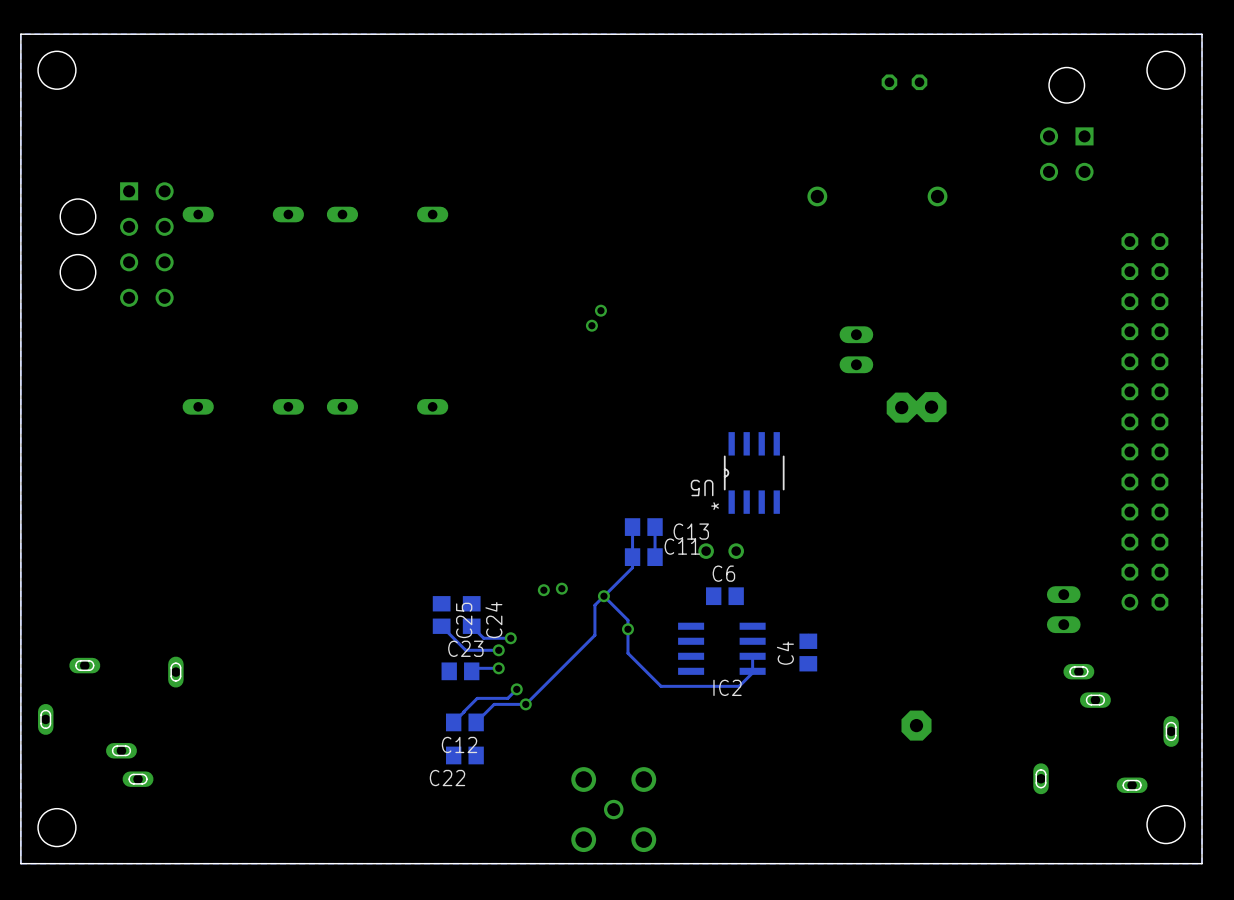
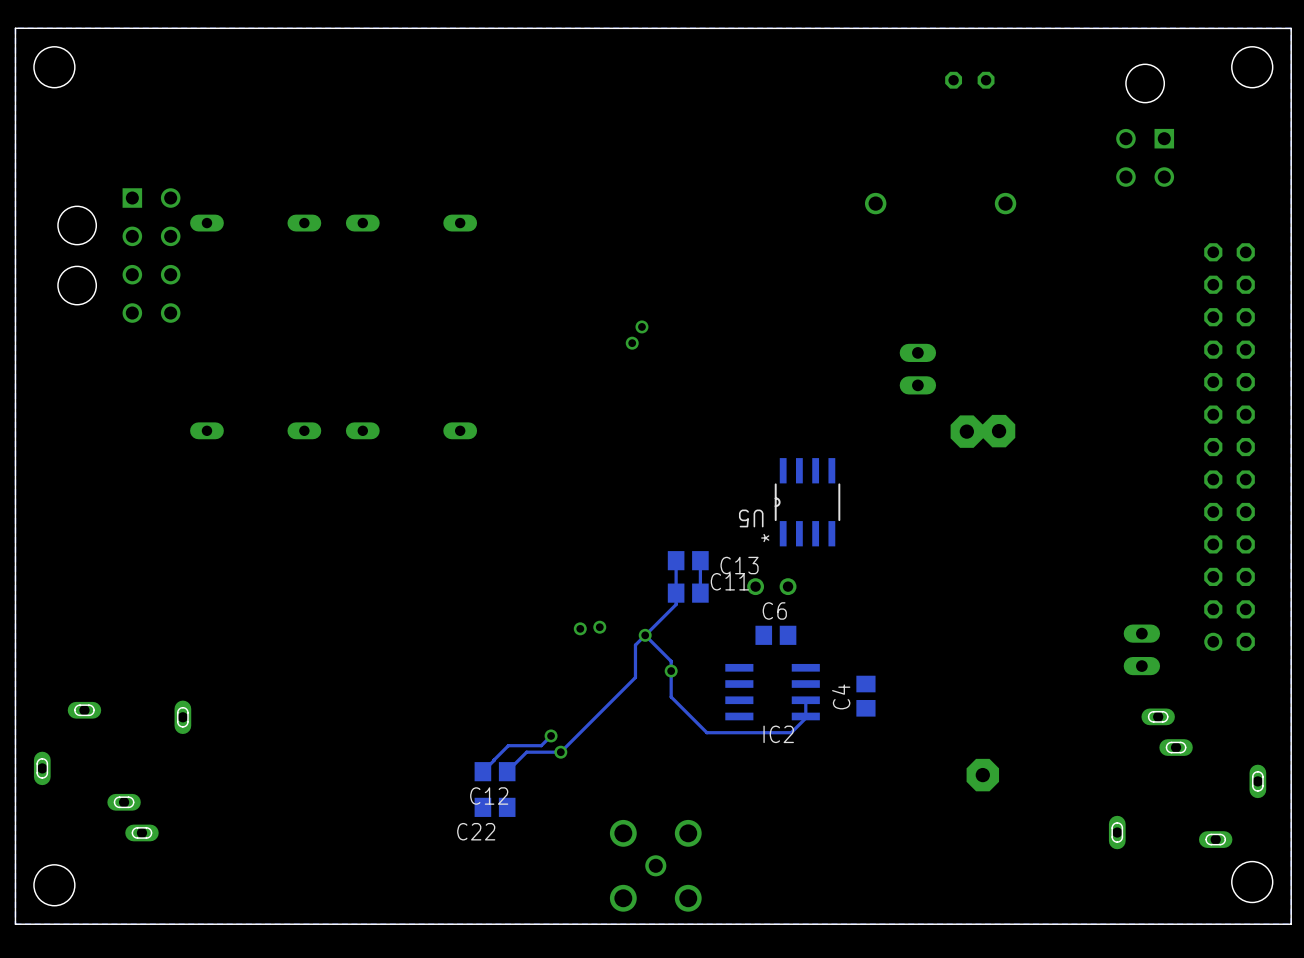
C25: (441, 615) -> none
C24: (471, 615) -> none
track: (441, 626) (465, 650) (498, 650) -> none
track: (471, 626) (483, 638) (510, 638) -> none
via: (510, 638) -> none
via: (498, 650) -> none
track: (498, 668) (474, 668) (471, 671) -> none
via: (498, 668) -> none
C23: (460, 671) -> none

